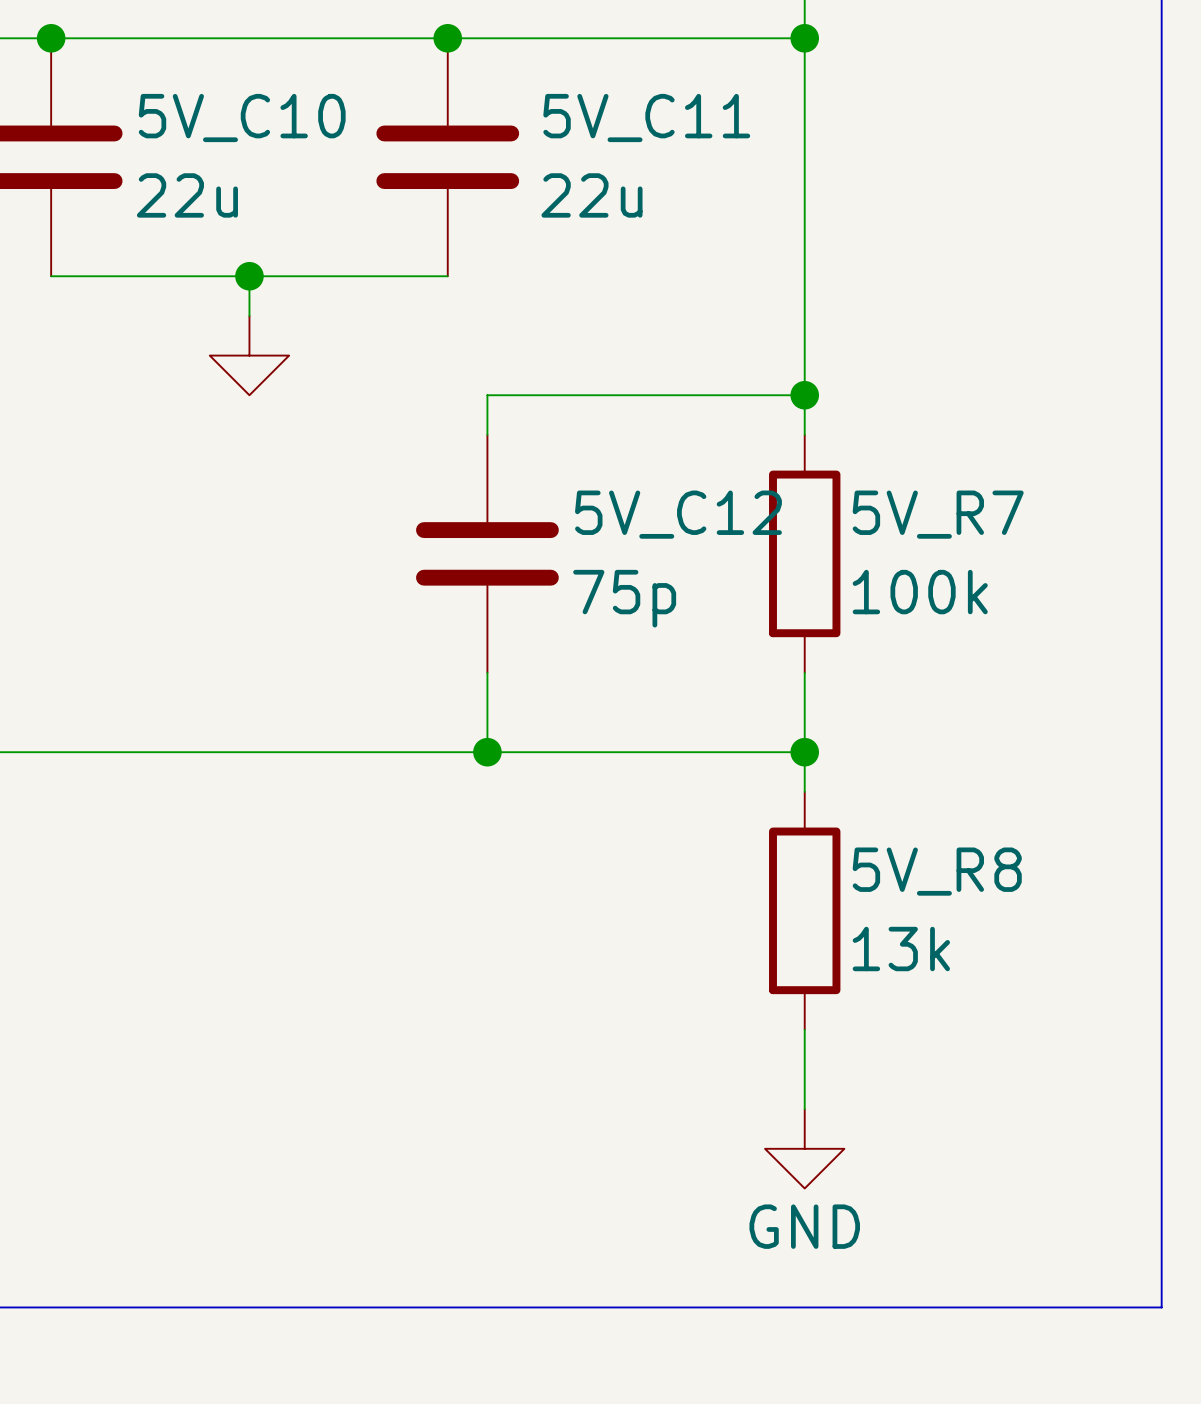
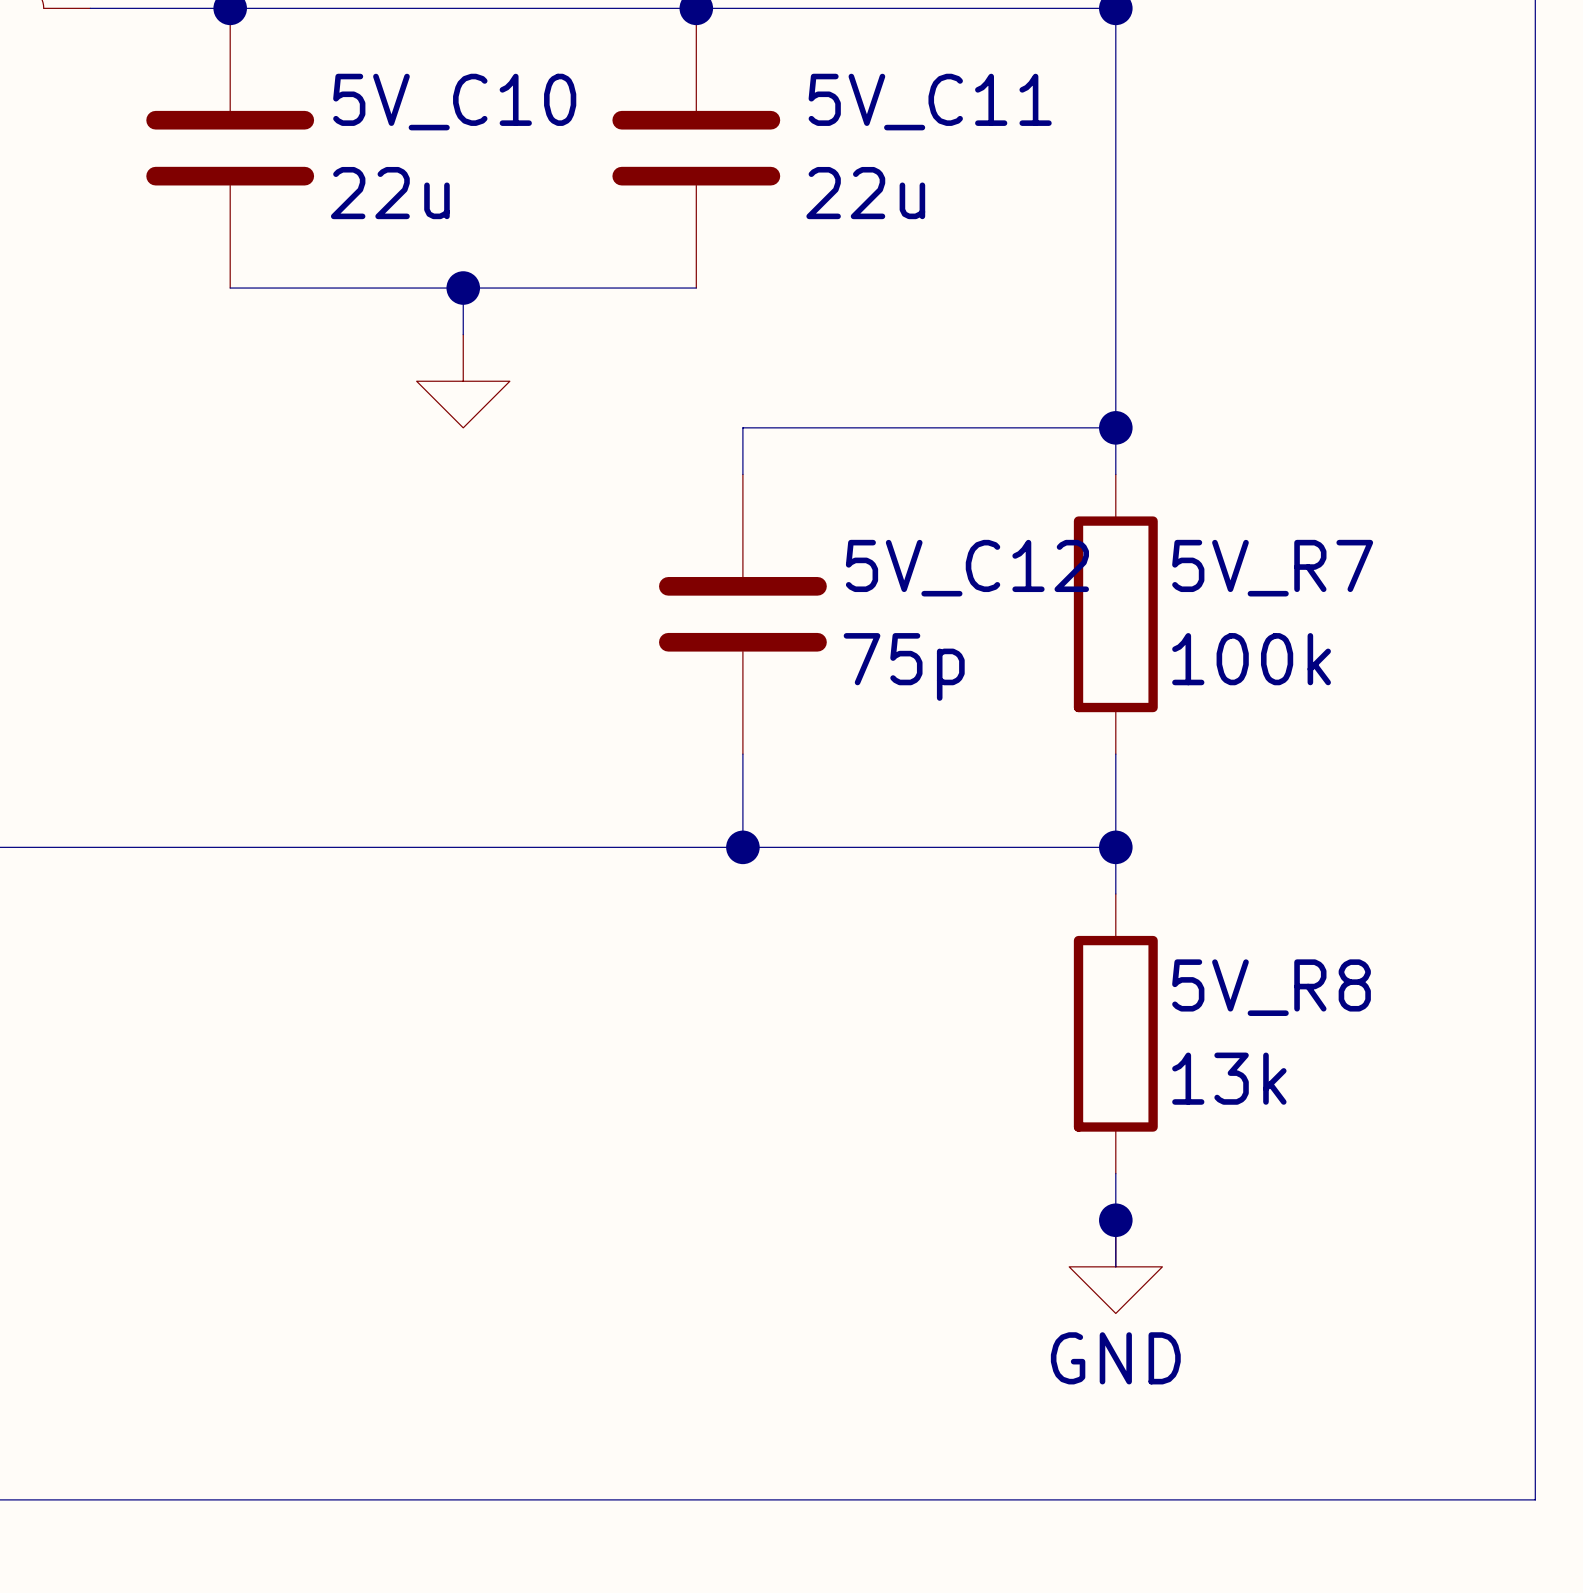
junction: none -> (1115, 1220)
power symbol position: GND (804, 1148) -> GND (1115, 1266)

